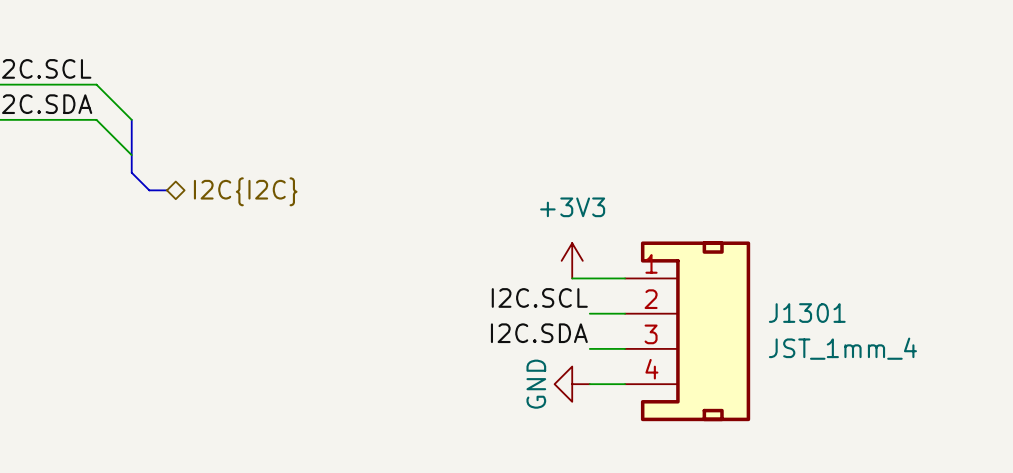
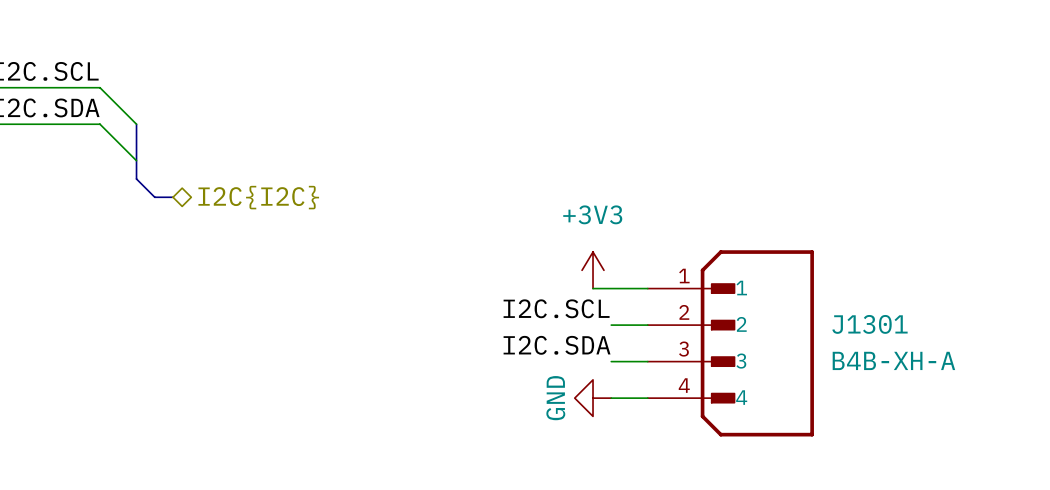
J1301 symbol: [625, 241, 751, 422] -> [647, 250, 814, 437]
J1301 value: JST_1mm_4 (842, 348) -> B4B-XH-A (893, 360)

